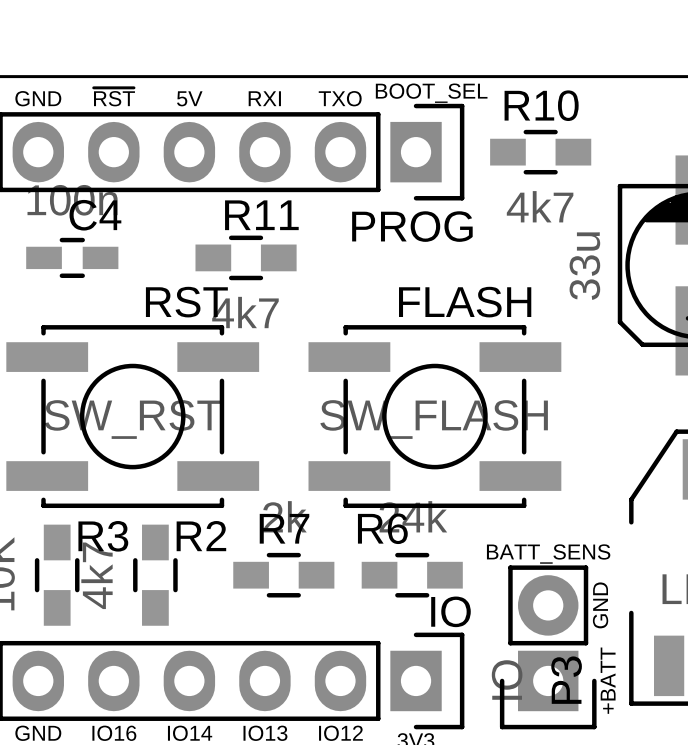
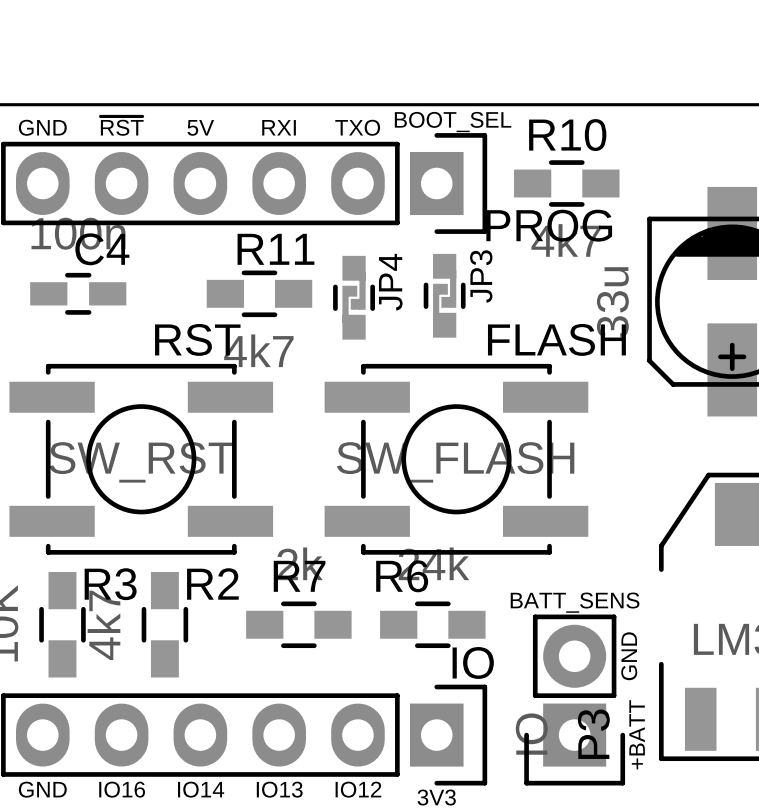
text position: PROG (412, 226) -> PROG (549, 225)
JP3: none -> (444, 295)
JP4: none -> (354, 297)
text position: FLASH (465, 302) -> FLASH (556, 339)

